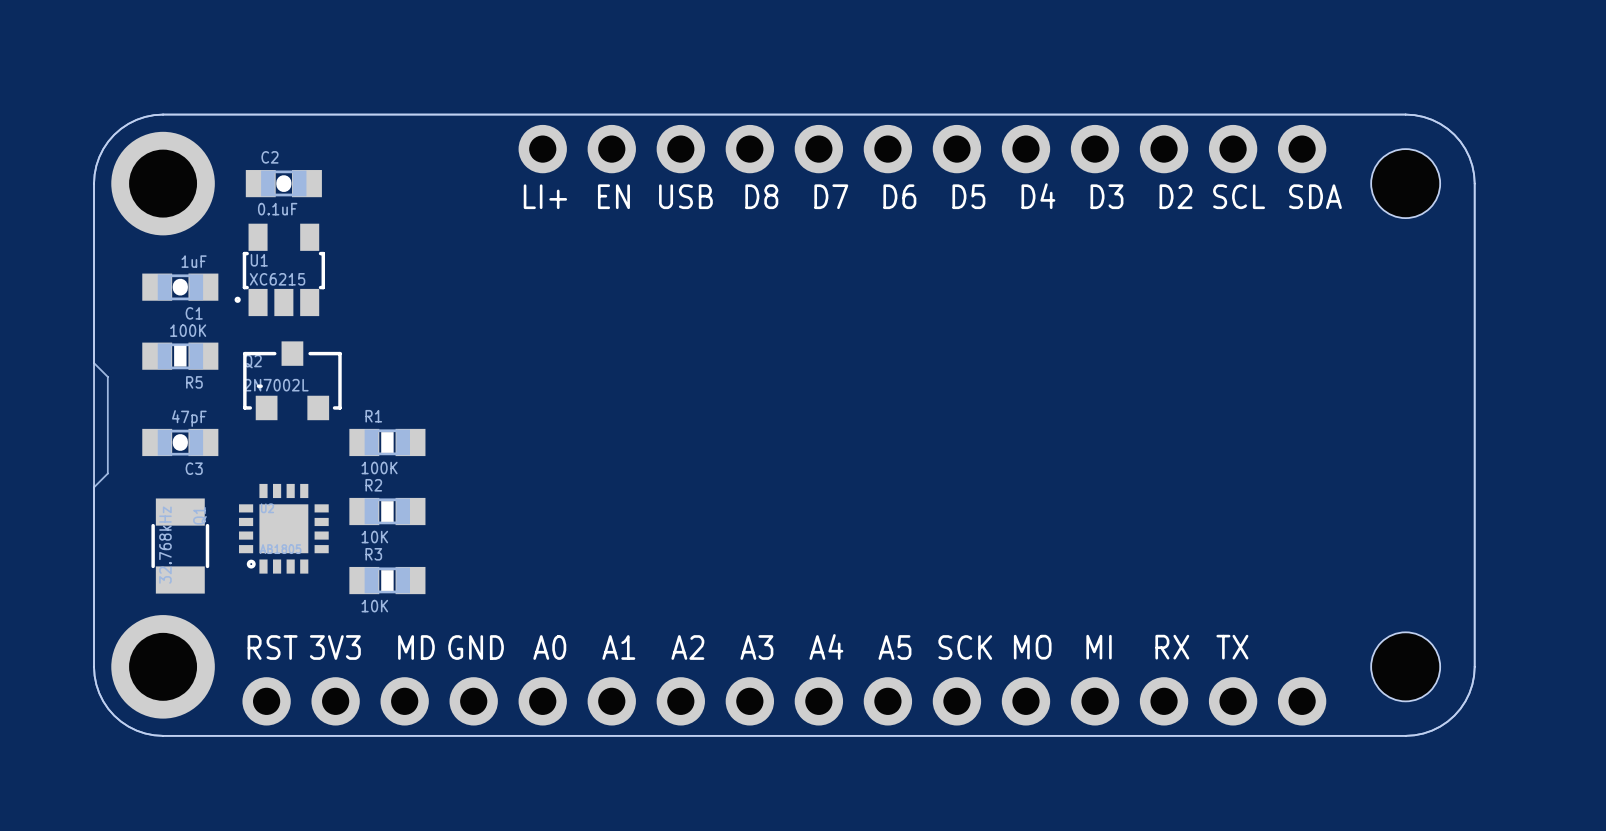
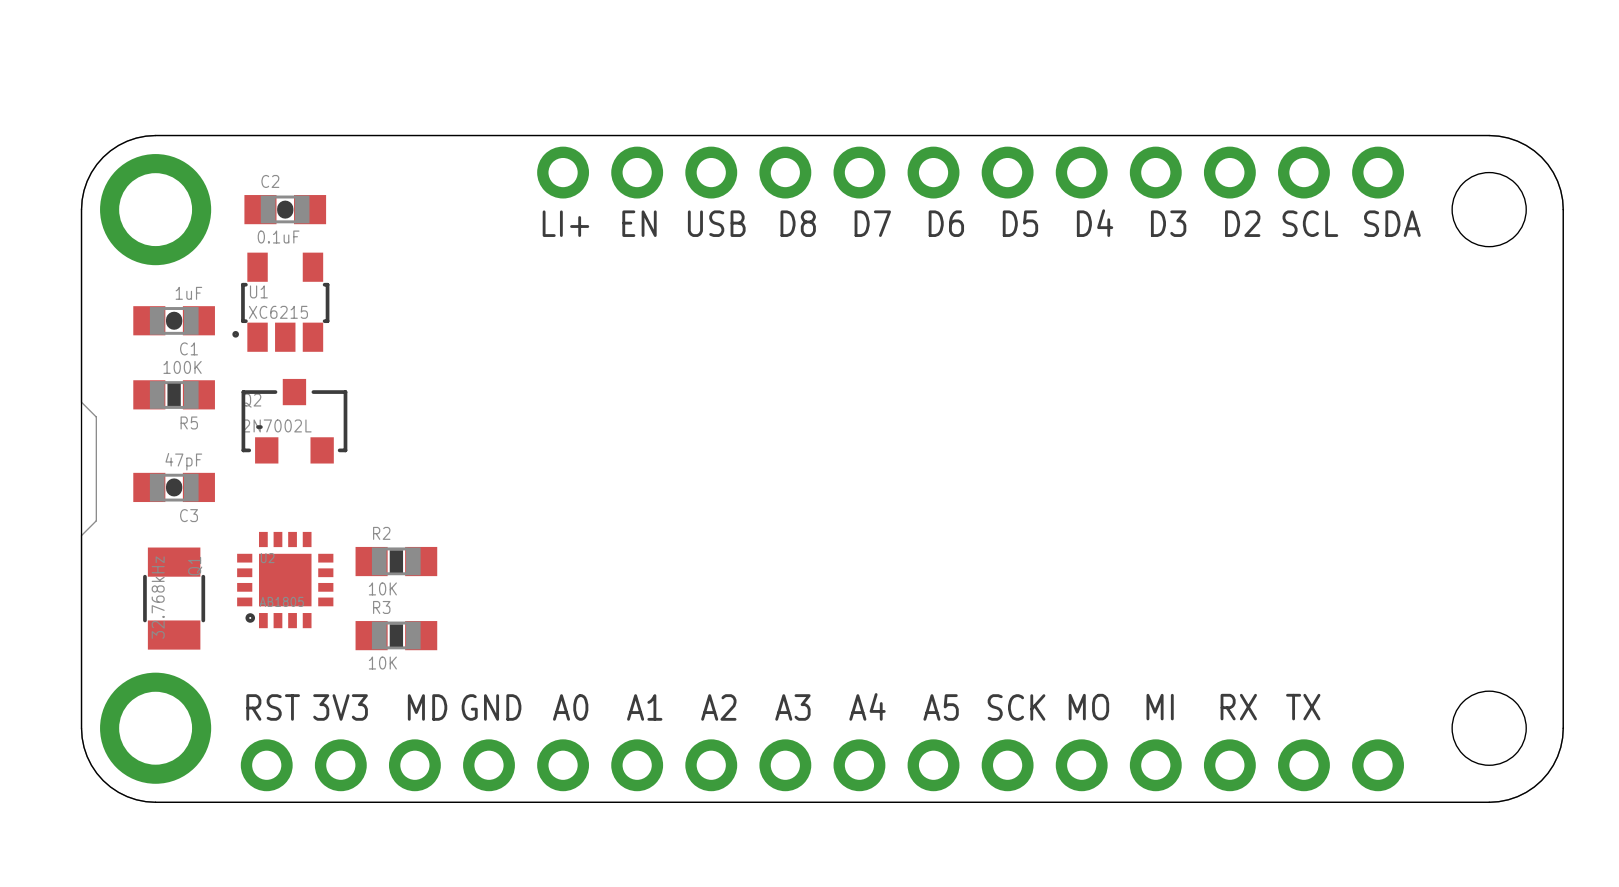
R1: 100K (387, 442) -> none

